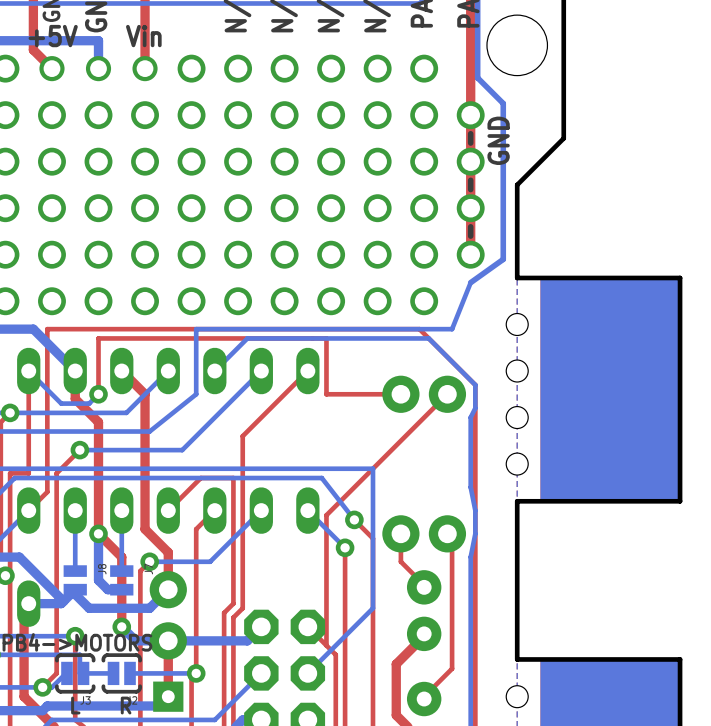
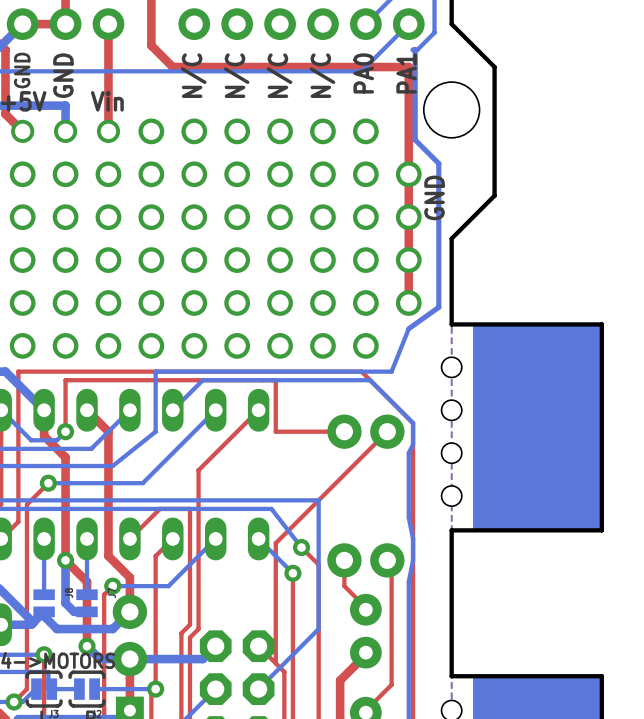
line: (470, 133) (470, 143) -> none
line: (470, 180) (470, 189) -> none
line: (470, 226) (470, 236) -> none

